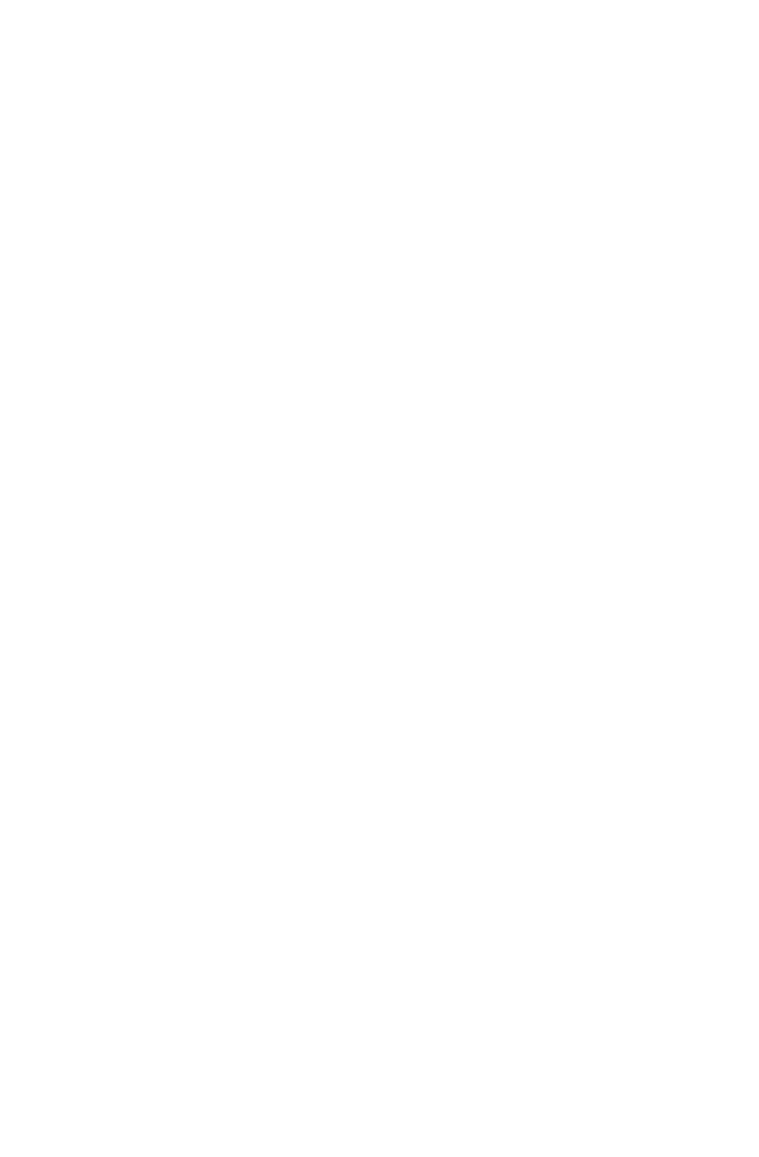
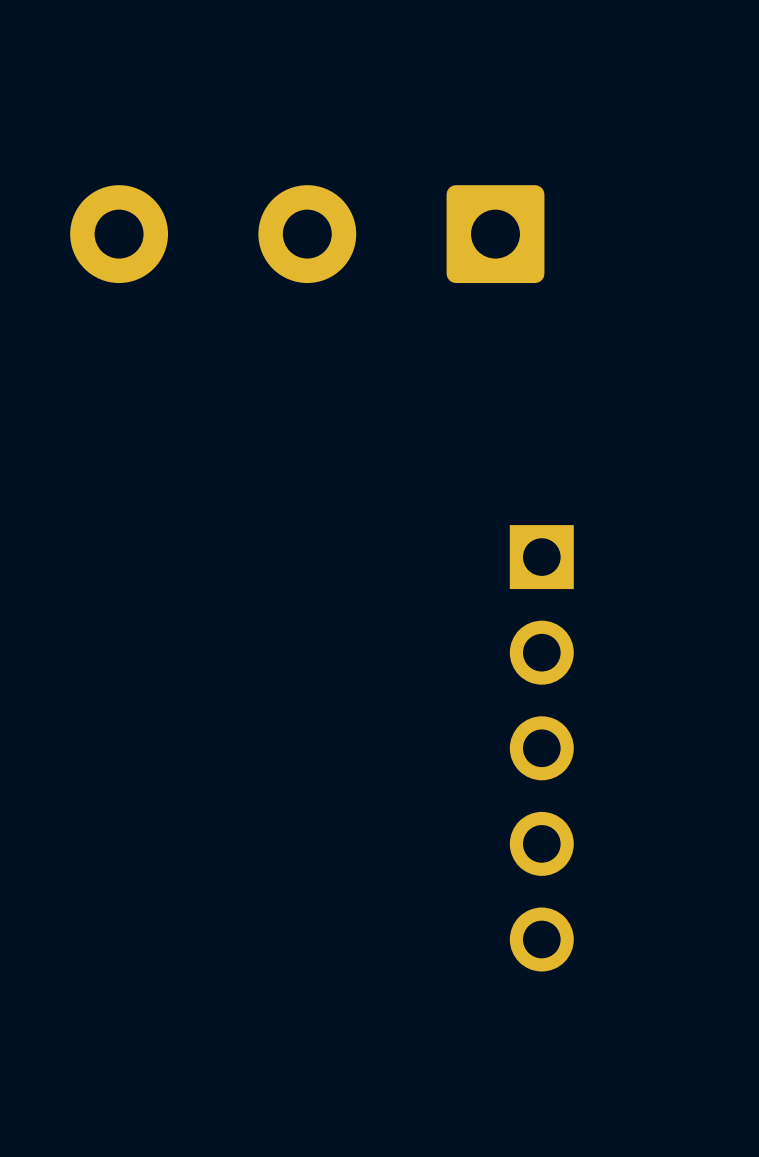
part: none -> (307, 234)
part: none -> (541, 748)

